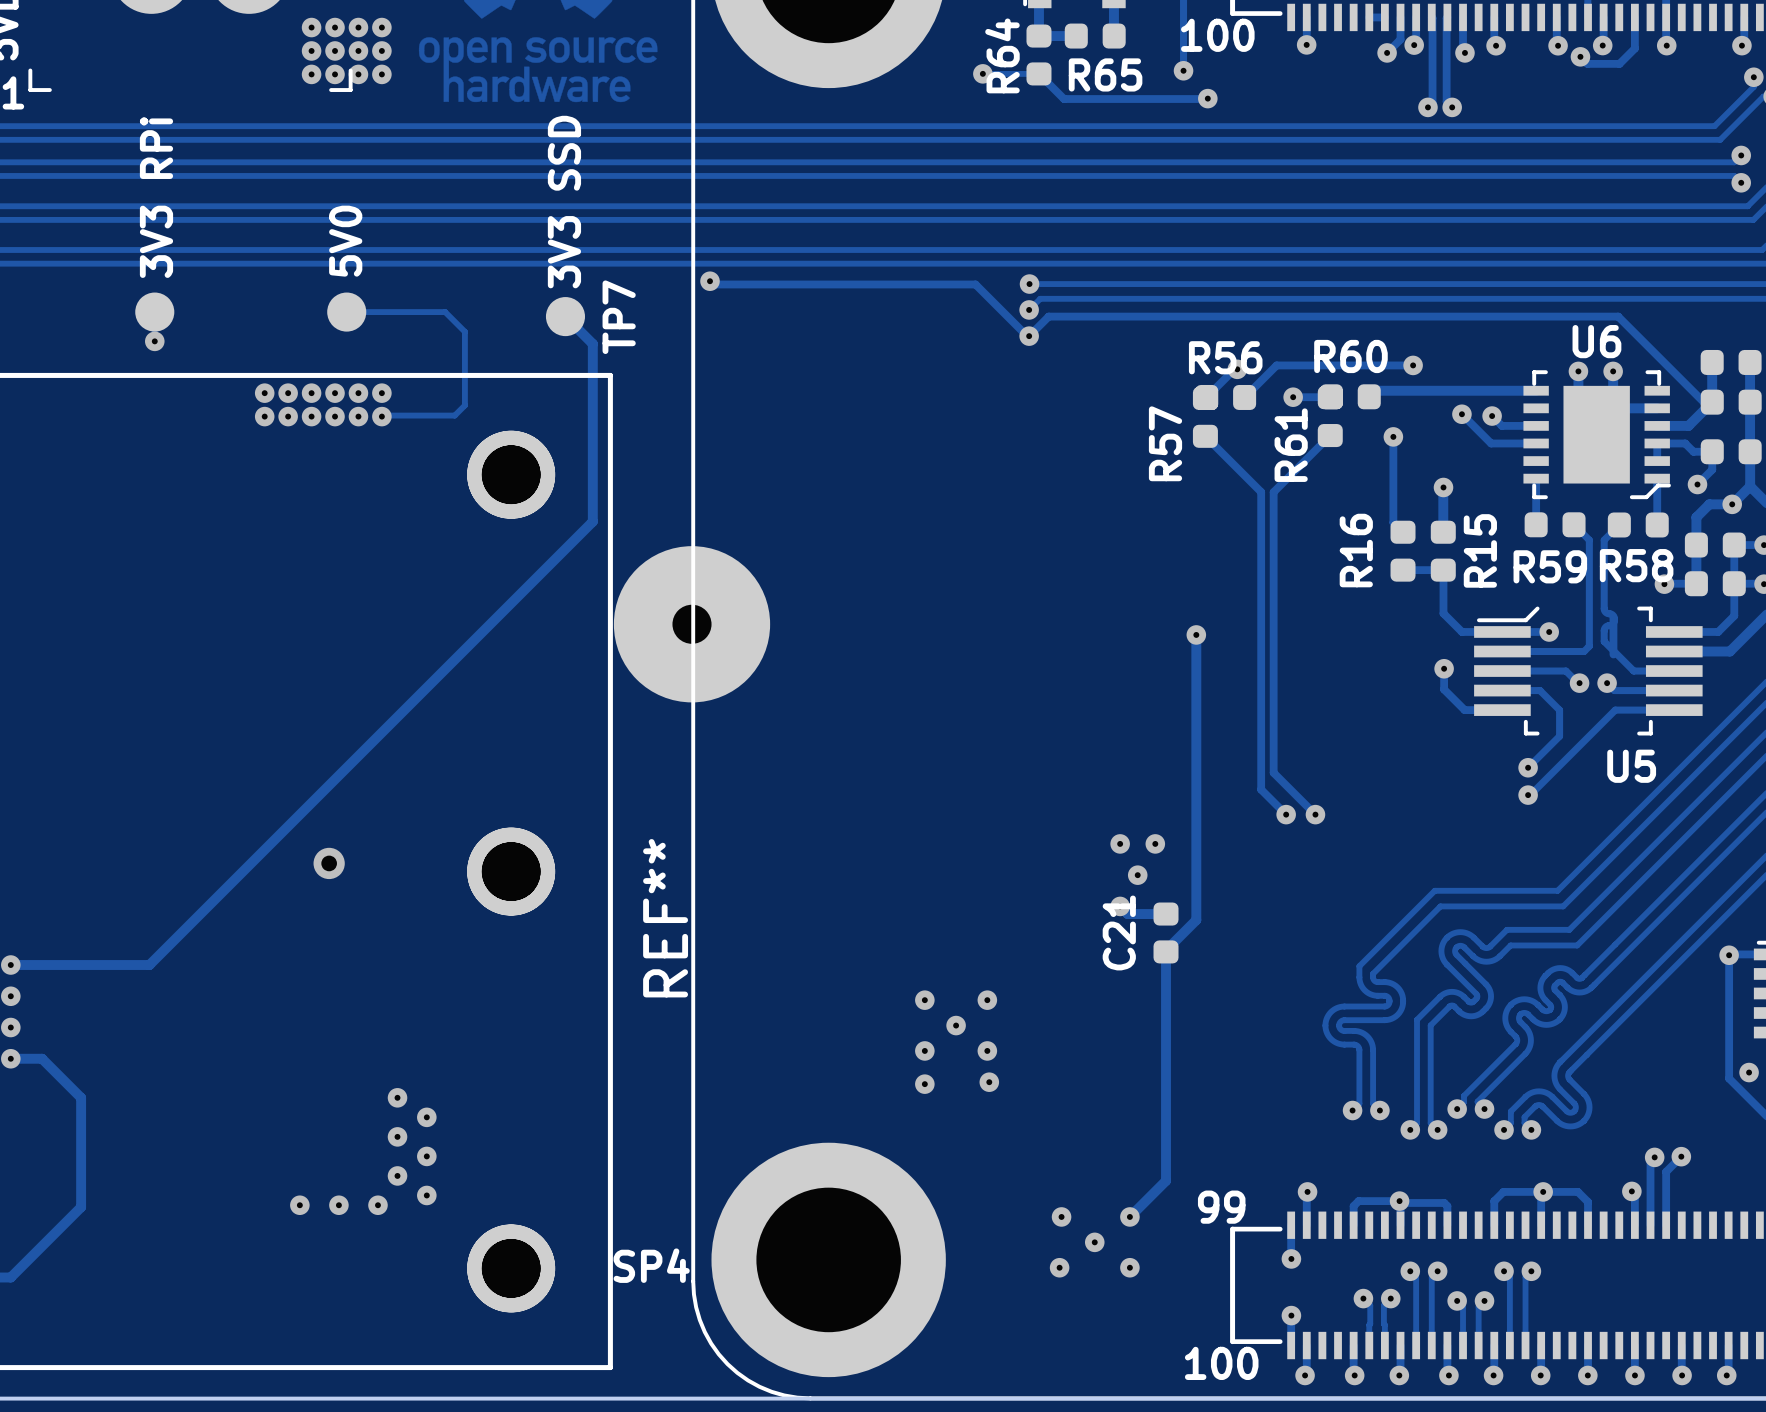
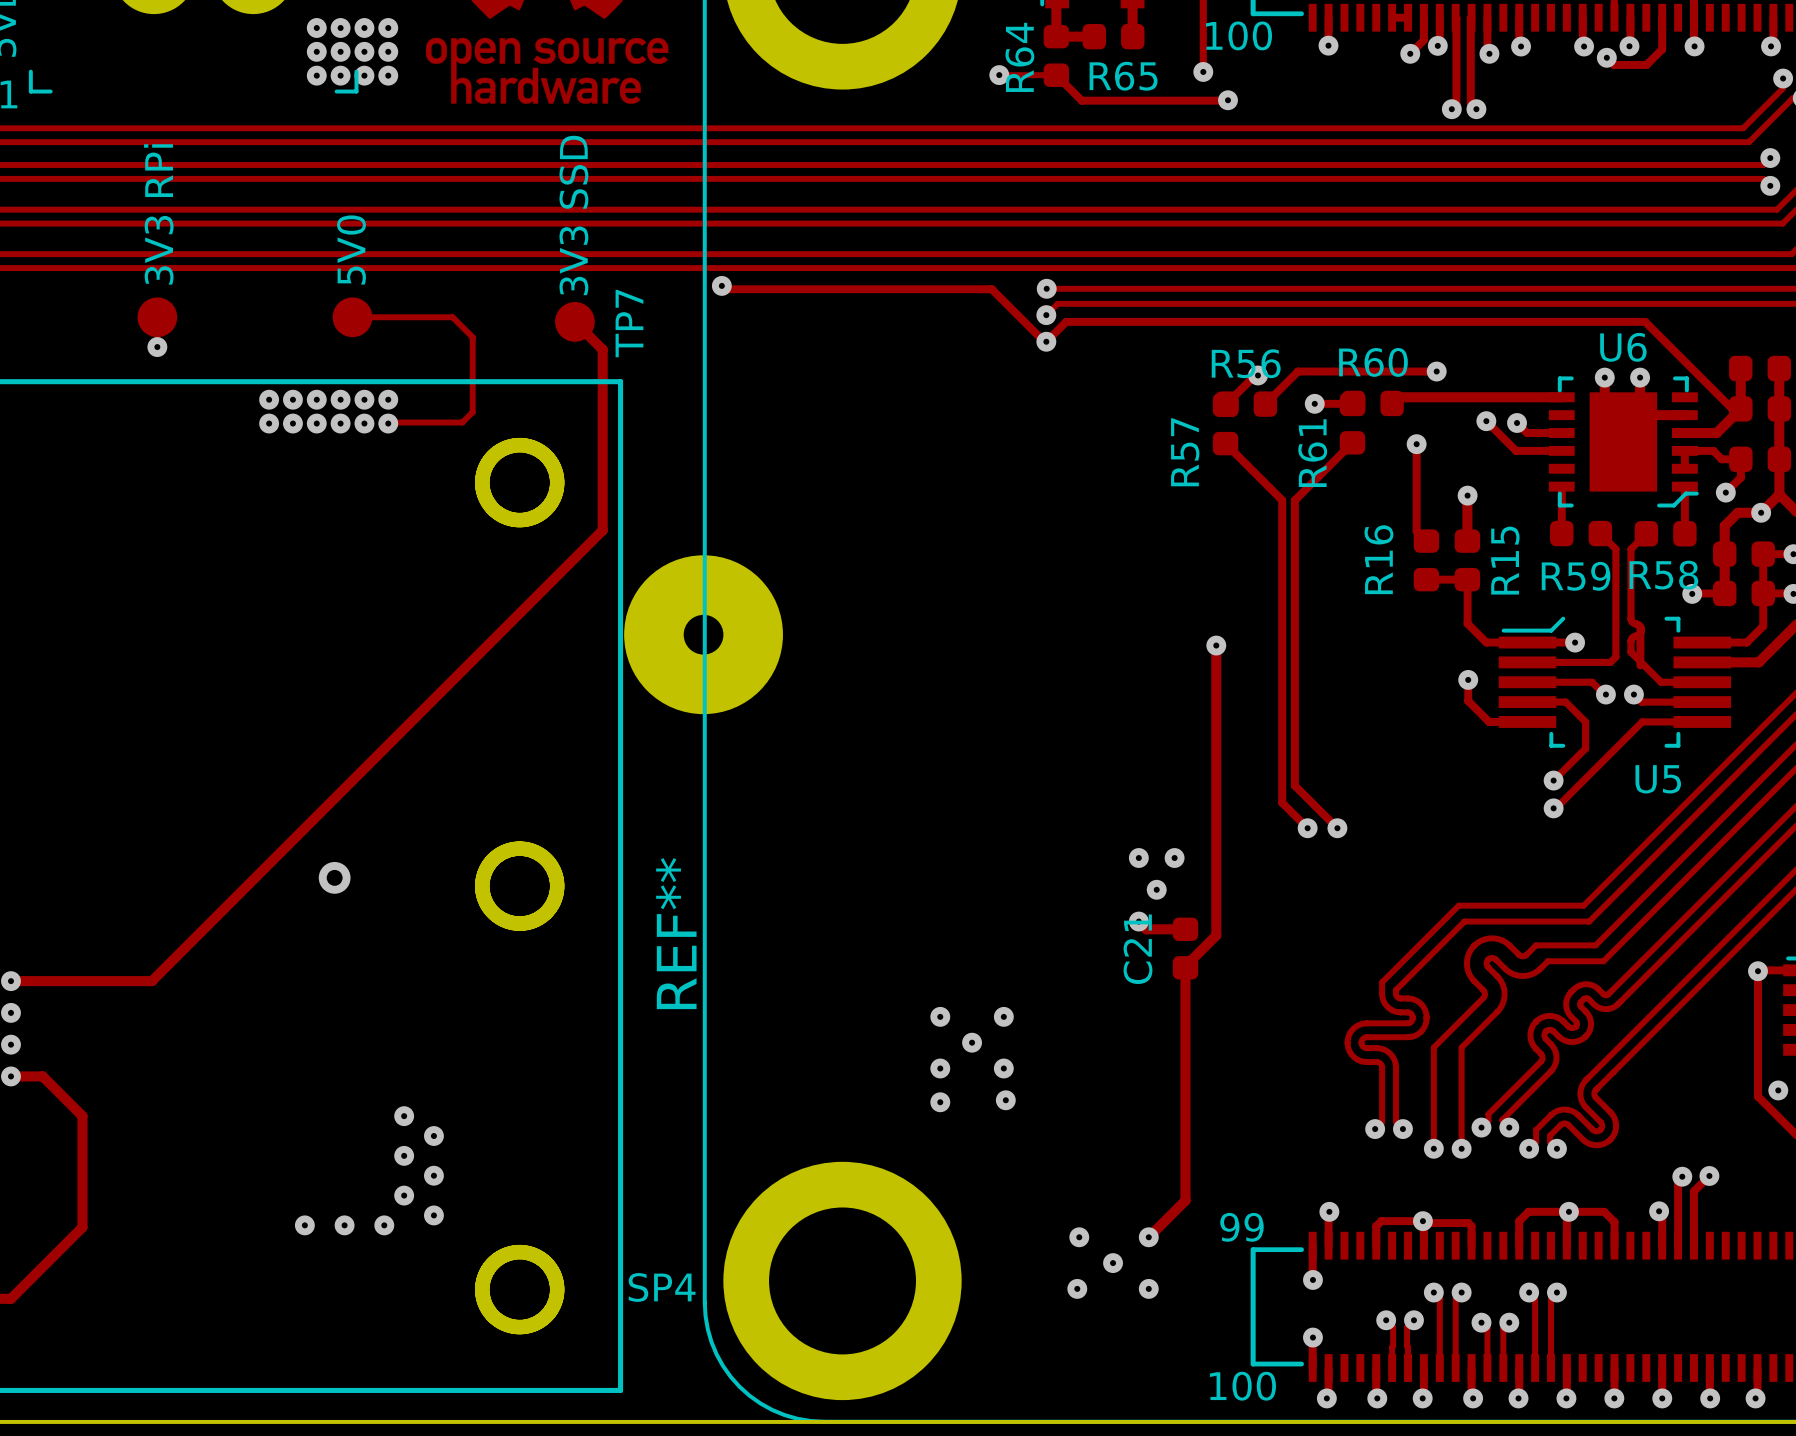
track: (1510, 929) (1506, 929) (1487, 947) (1483, 946) (1470, 935) (1462, 932) (1452, 934) (1443, 941) (1441, 951) (1443, 960) (1477, 996) (1470, 1002) (1457, 992) (1446, 992) (1417, 1019) (1417, 1123) (1410, 1129) -> (1535, 945) (1526, 955) (1522, 956) (1504, 941) (1488, 938) (1479, 941) (1470, 950) (1467, 960) (1467, 969) (1472, 978) (1484, 991) (1484, 995) (1433, 1047) (1433, 1148)
track: (1522, 945) (1510, 945) (1498, 957) (1486, 961) (1476, 959) (1462, 946) (1458, 946) (1455, 948) (1456, 954) (1487, 985) (1490, 998) (1487, 1006) (1478, 1014) (1465, 1015) (1451, 1005) (1430, 1025) (1430, 1123) (1437, 1129) -> (1547, 961) (1535, 972) (1522, 976) (1510, 972) (1494, 958) (1487, 961) (1487, 966) (1502, 983) (1504, 996) (1499, 1009) (1461, 1047) (1461, 1148)

